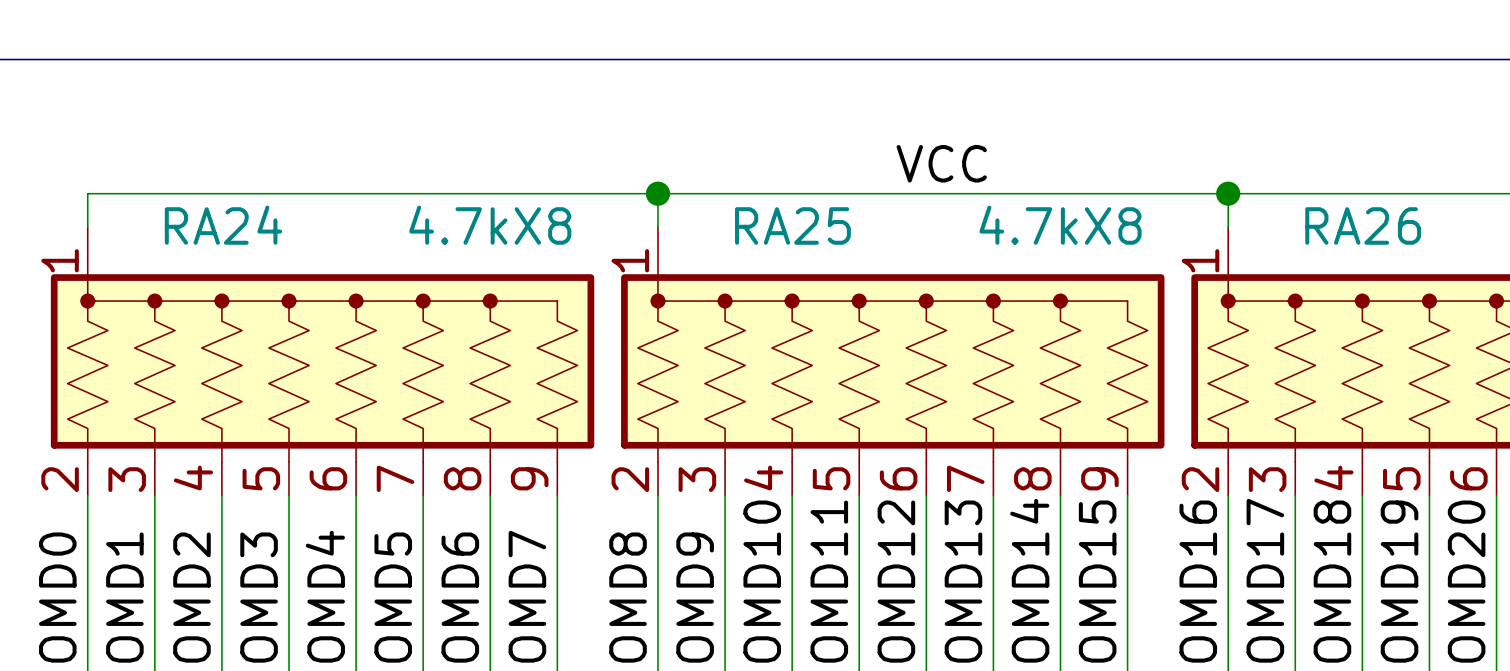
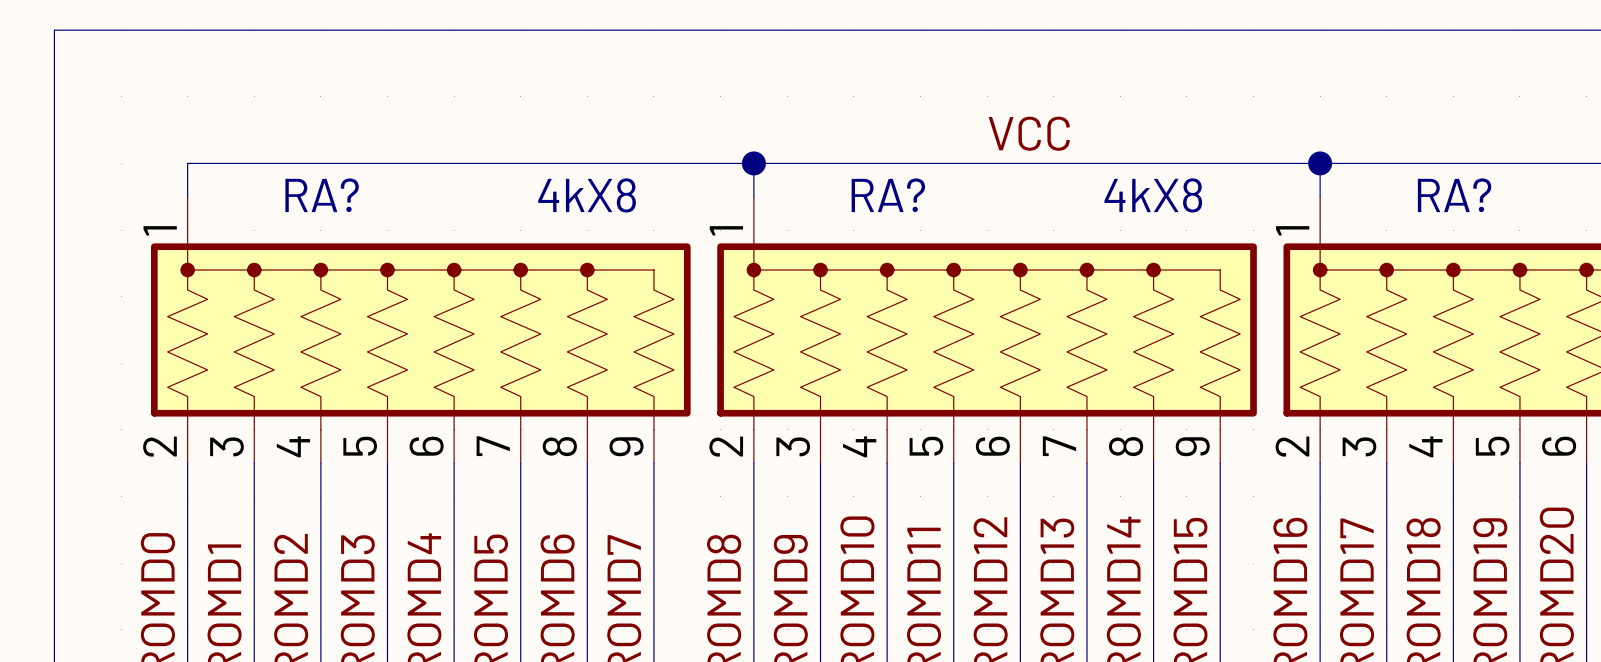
RA24 name: RA24 (223, 225) -> RA? (322, 195)
RA24 value: 4.7kX8 (490, 225) -> 4kX8 (587, 195)
RA25 name: RA25 (792, 225) -> RA? (888, 195)
RA25 value: 4.7kX8 (1060, 225) -> 4kX8 (1153, 195)
RA26 name: RA26 (1363, 225) -> RA? (1454, 195)

